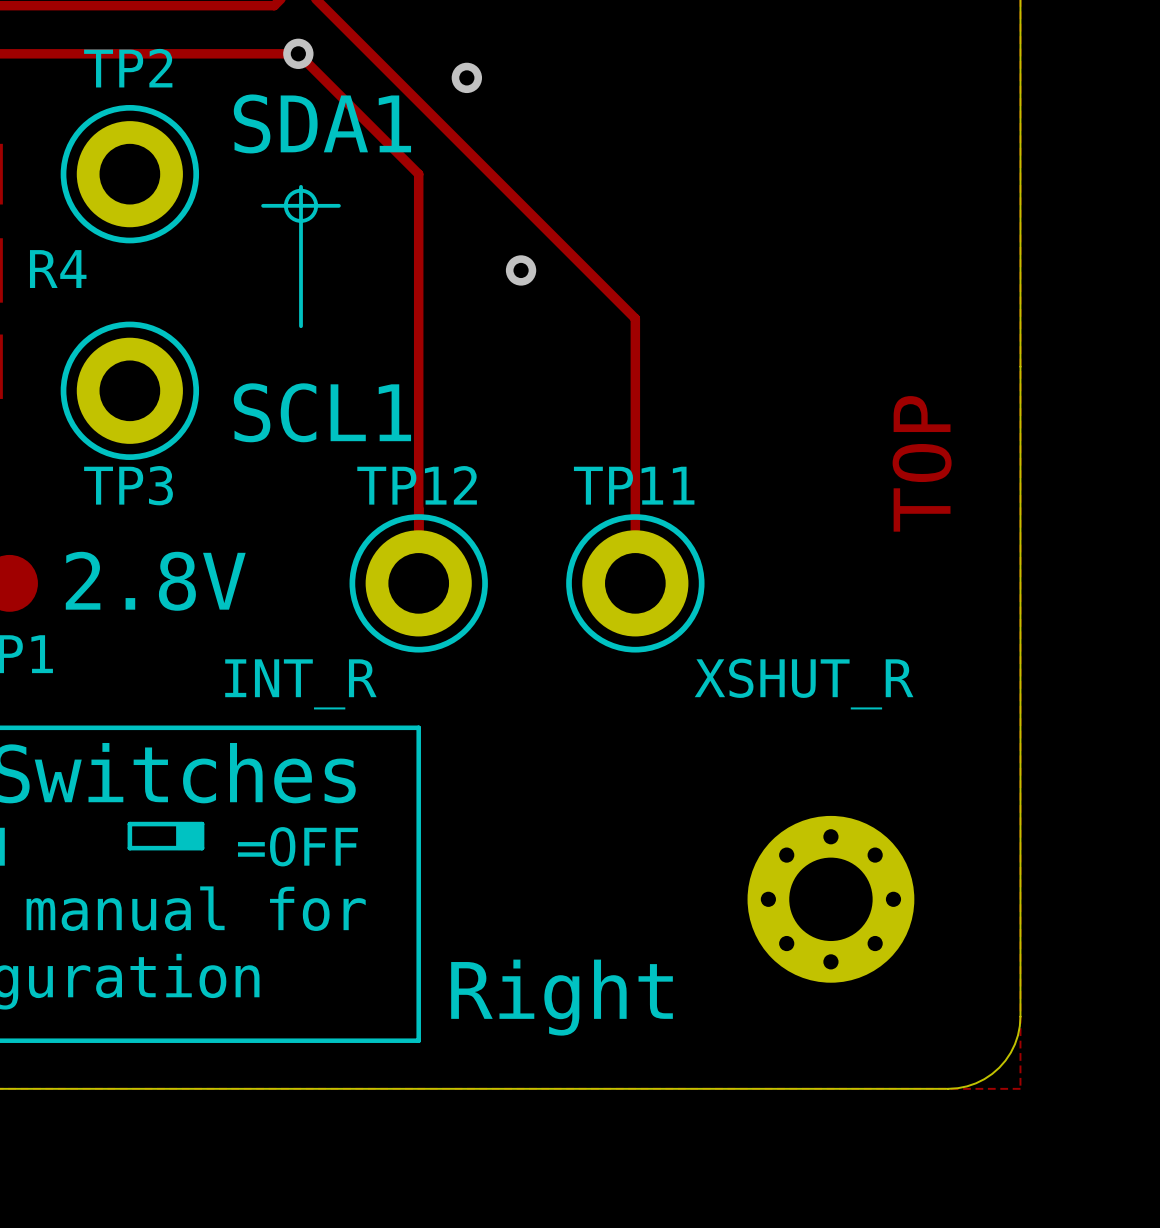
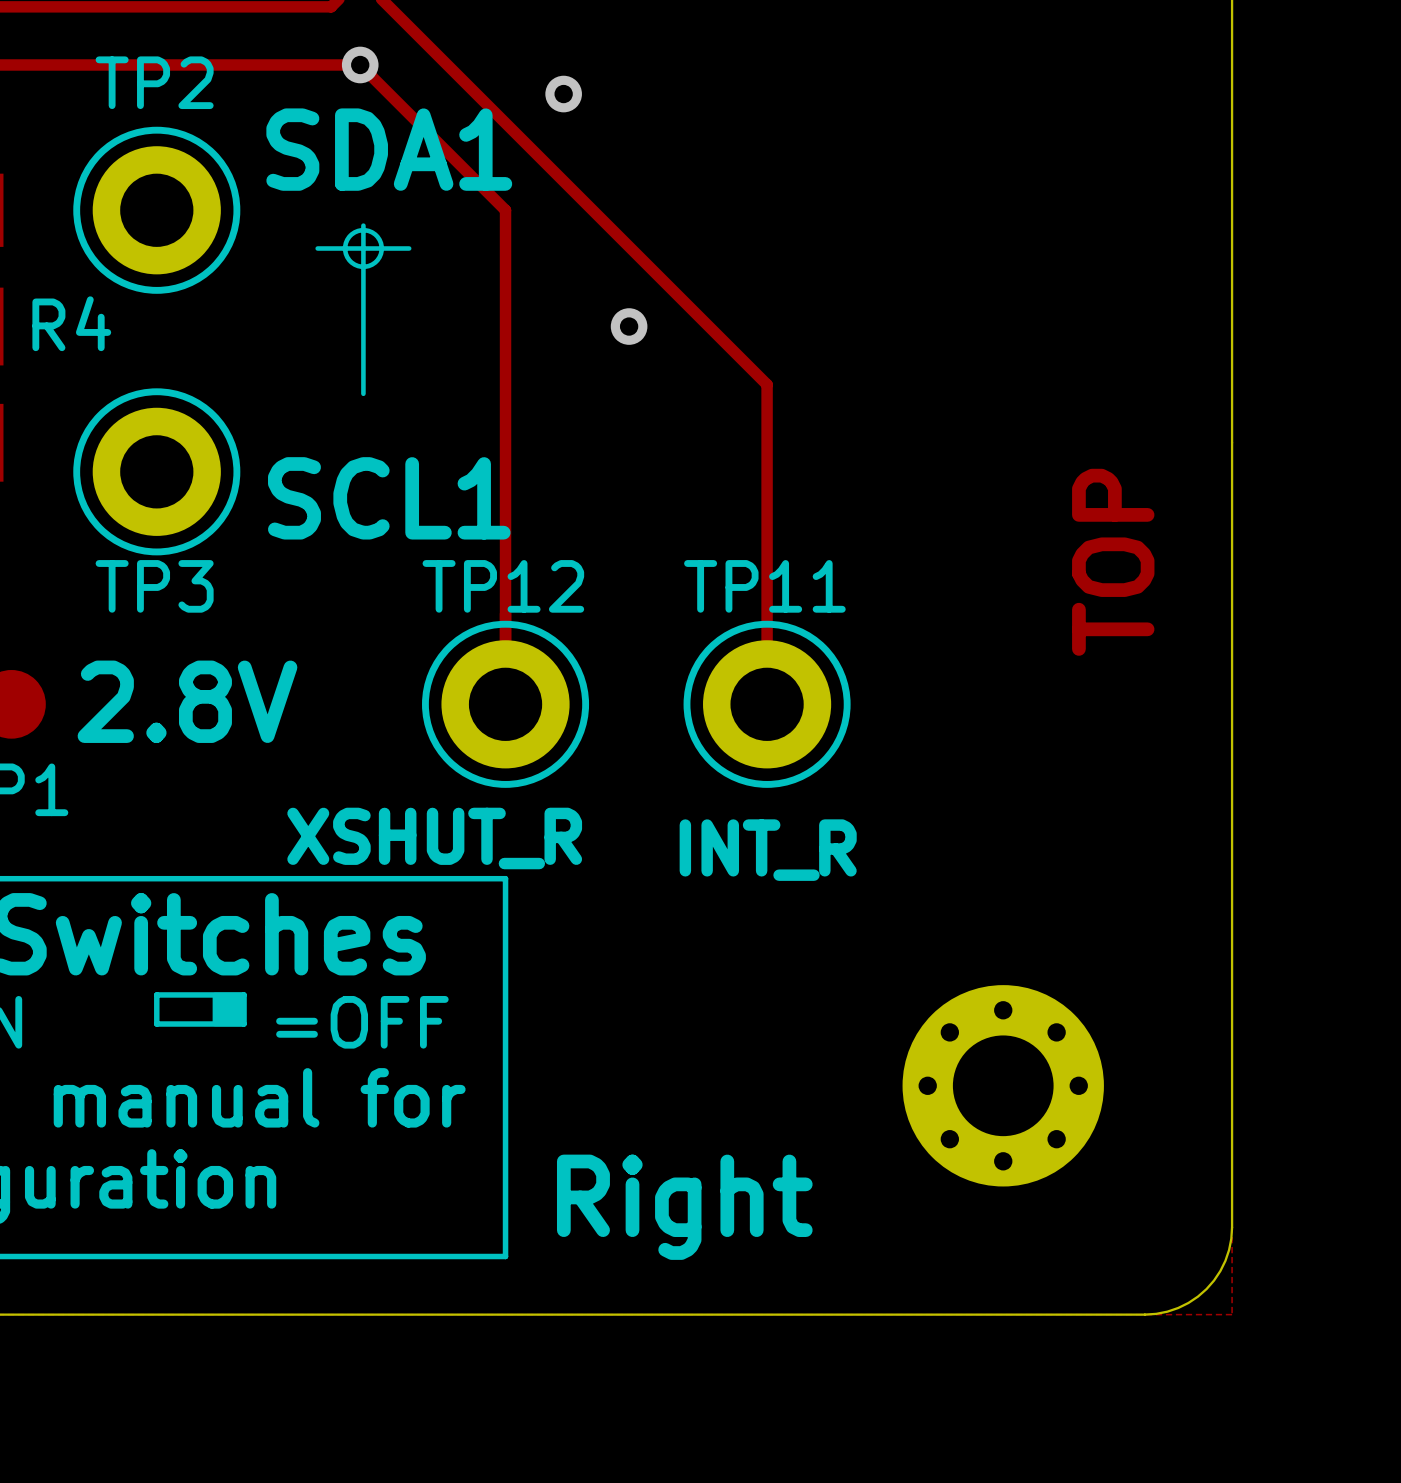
text position: INT_R (300, 684) -> INT_R (768, 850)
text position: XSHUT_R (804, 684) -> XSHUT_R (434, 838)

